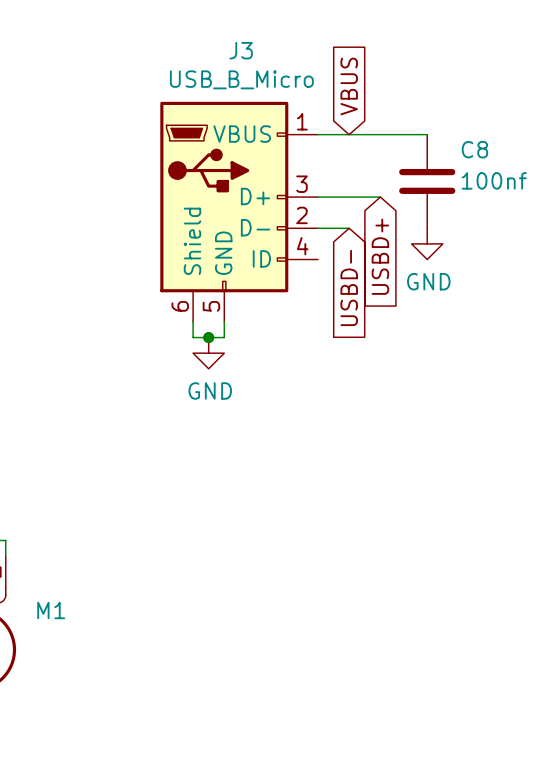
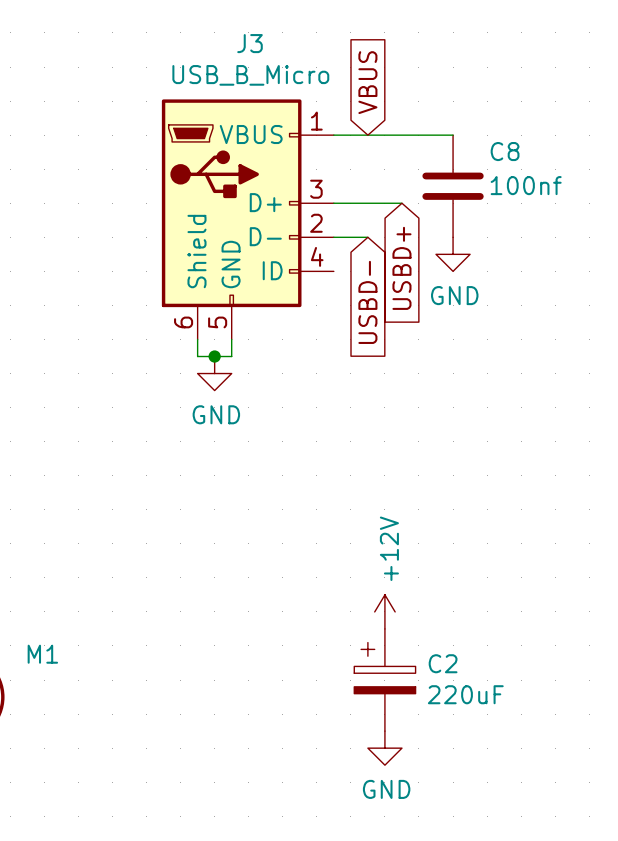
power symbol: none -> +12V (384, 611)
C2: none -> 220uF (384, 680)
power symbol: none -> GND (384, 748)

